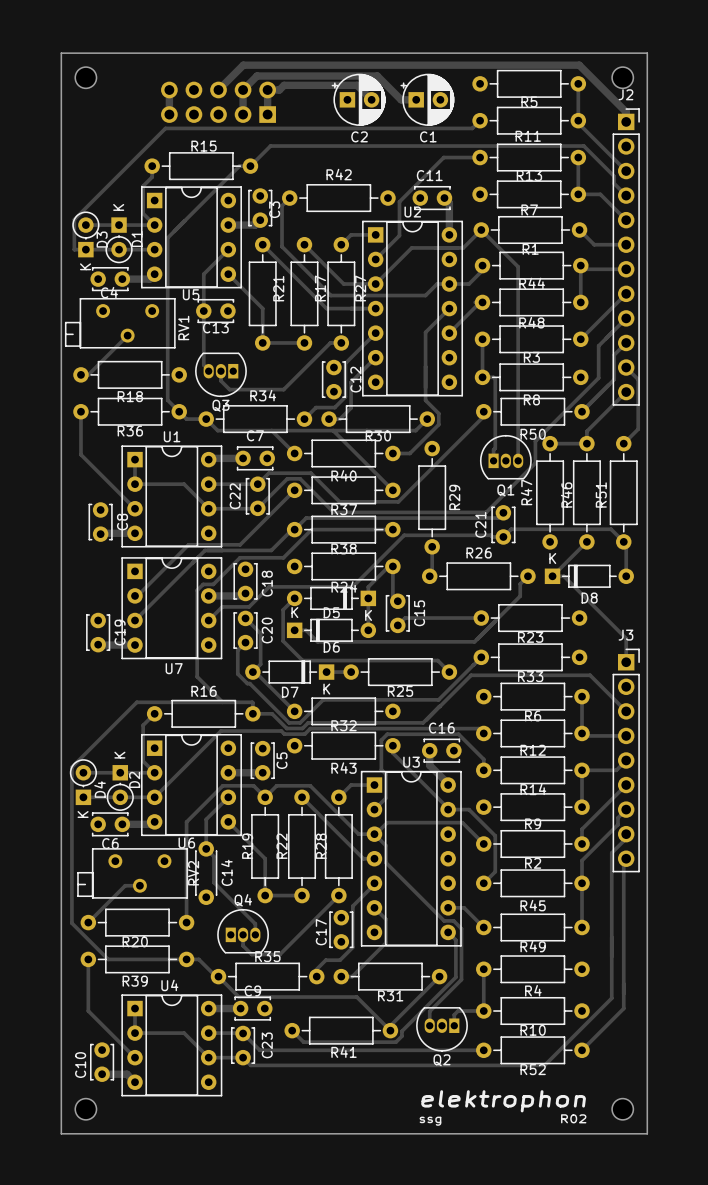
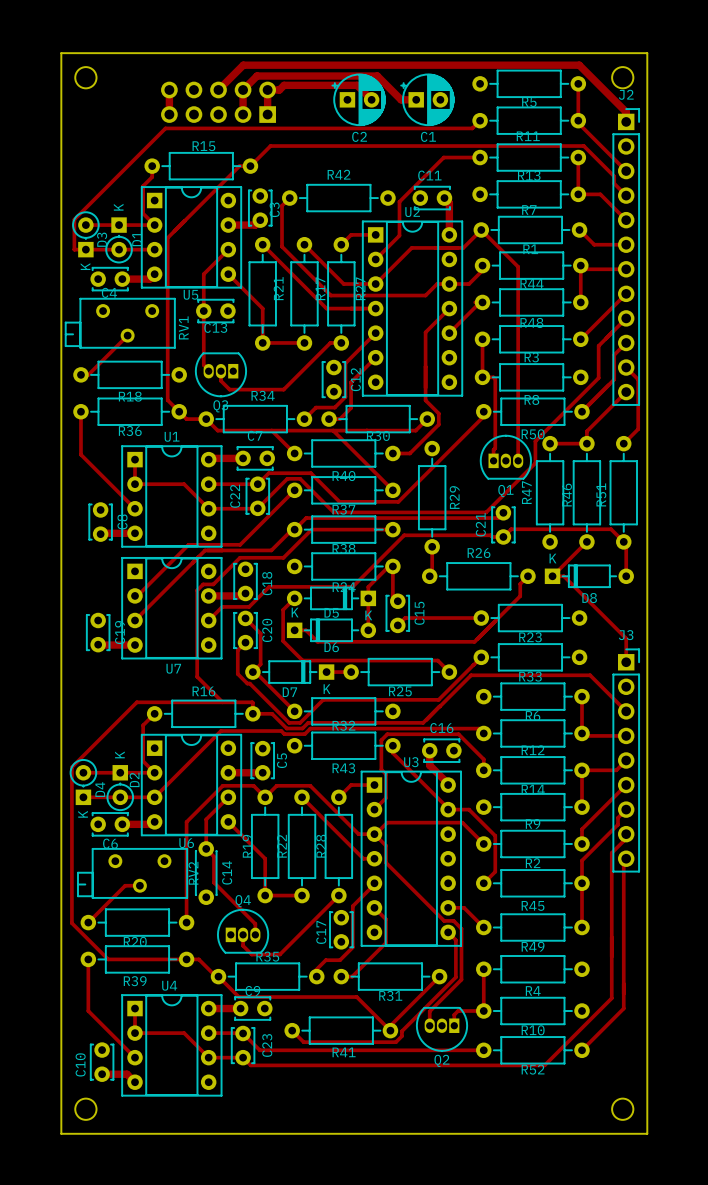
drawing: [419, 1090, 587, 1126] -> none

